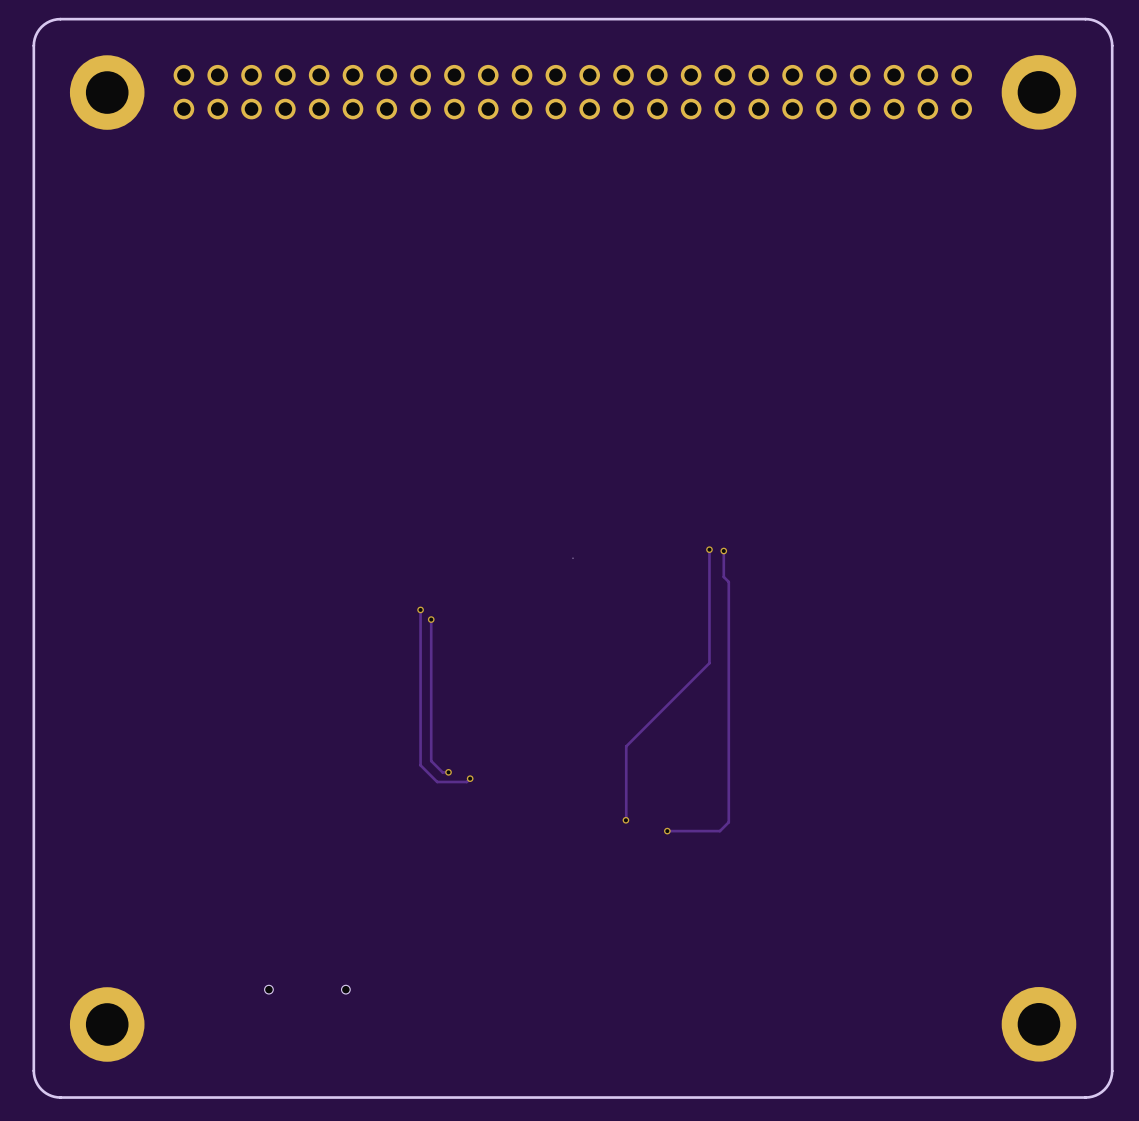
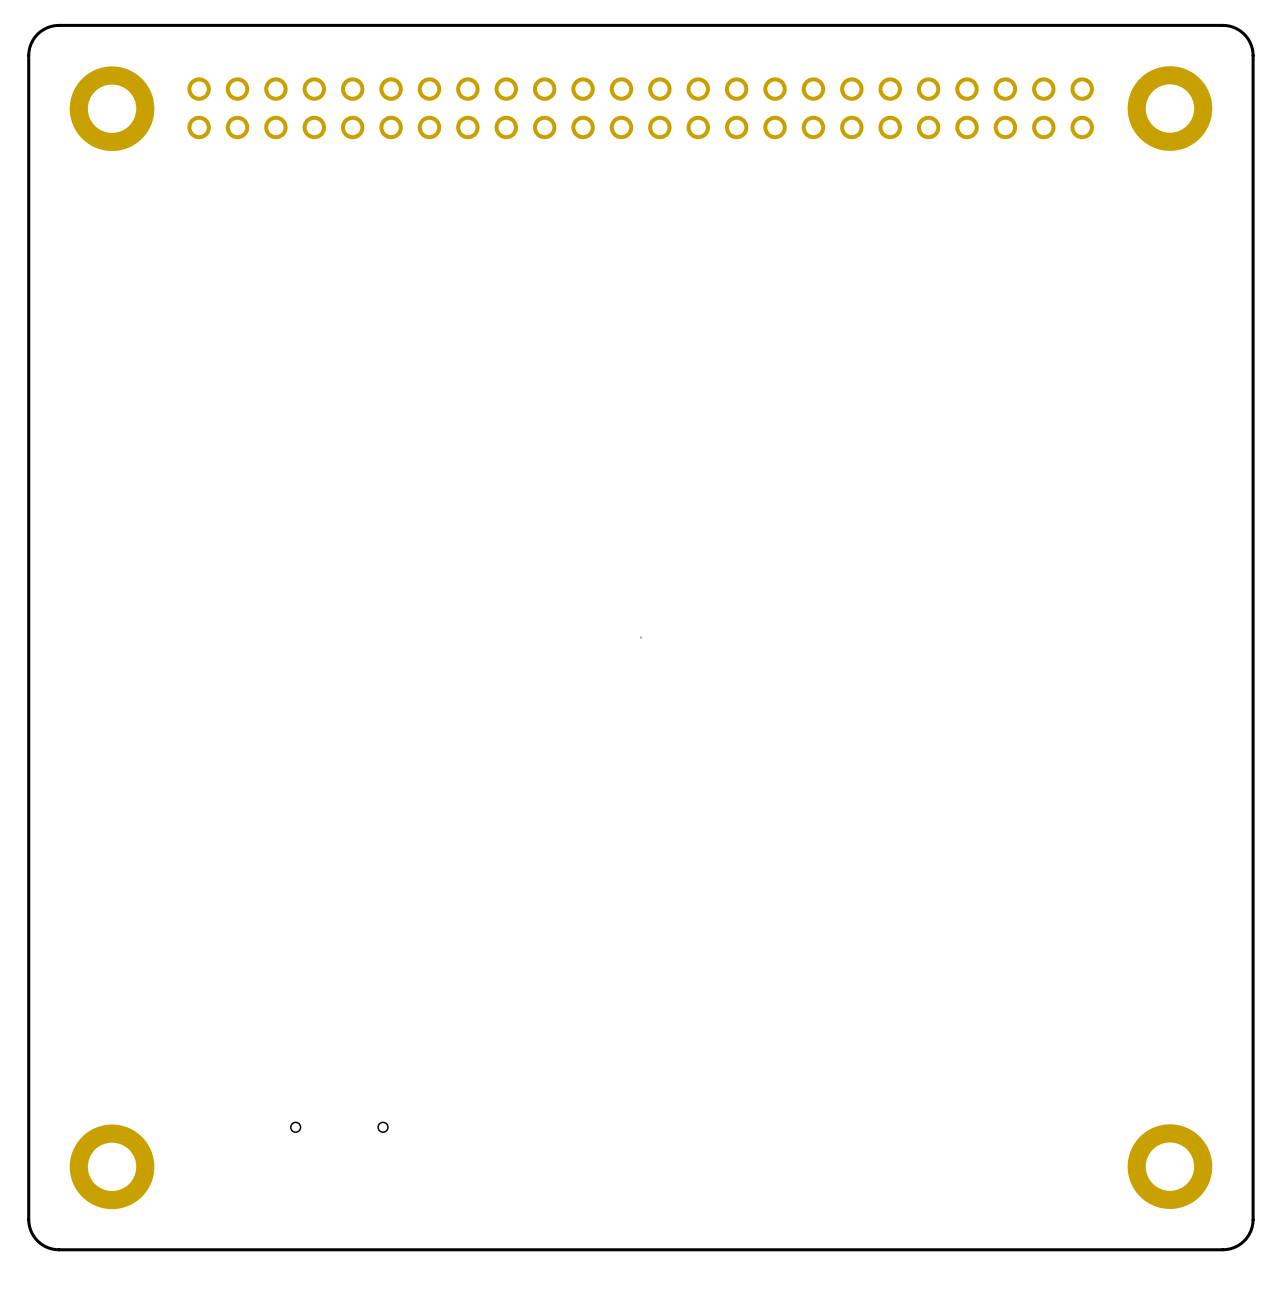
track: (709, 549) (709, 663) (626, 746) (625, 820) -> none
via: (709, 549) -> none
track: (723, 551) (723, 576) (728, 581) (728, 822) (719, 831) (667, 831) -> none
via: (723, 551) -> none
track: (420, 609) (420, 765) (437, 781) (466, 781) (470, 778) -> none
via: (420, 609) -> none
track: (431, 619) (431, 761) (442, 772) (448, 772) -> none
via: (431, 619) -> none
via: (448, 772) -> none
via: (470, 778) -> none
via: (625, 820) -> none
via: (667, 831) -> none

